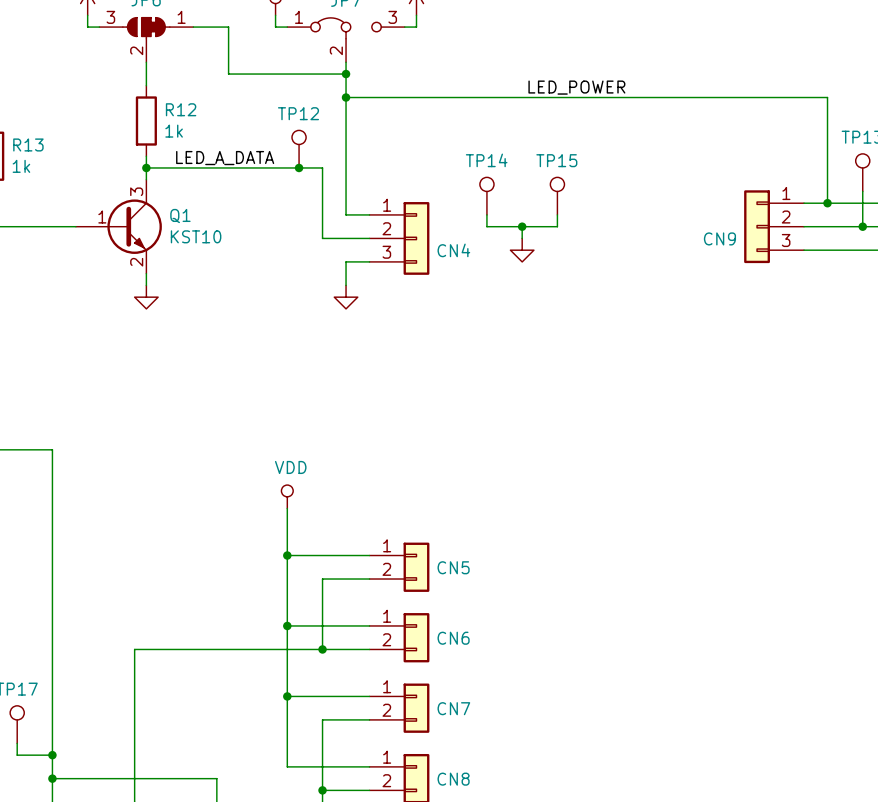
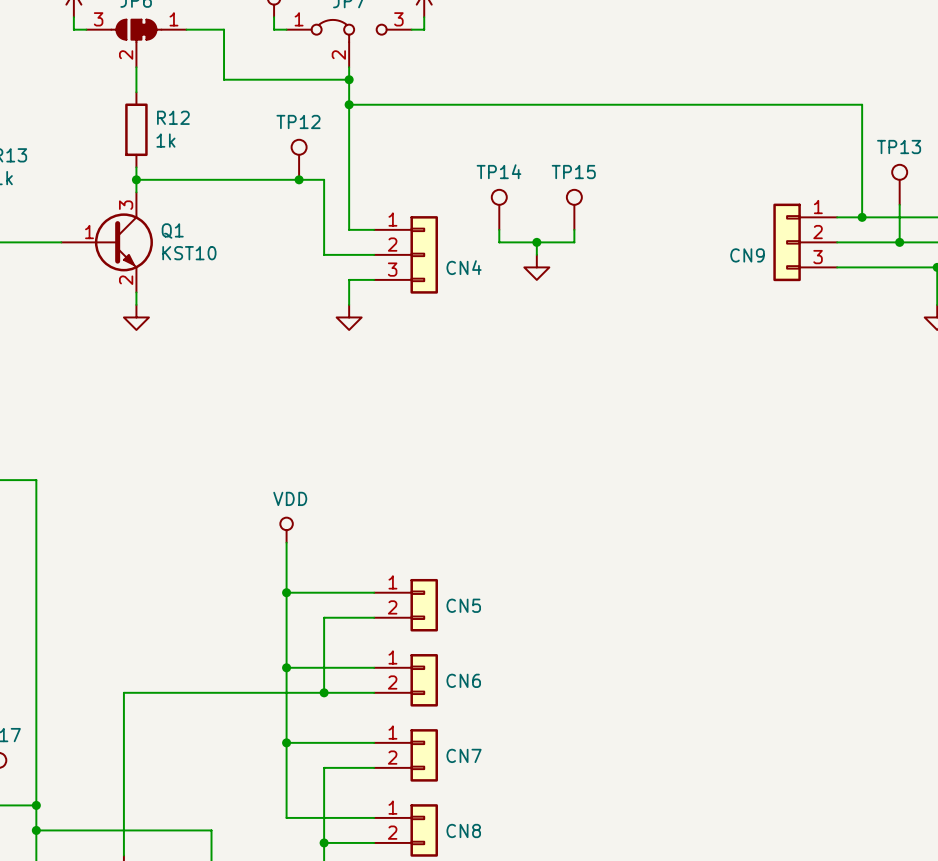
label: LED_POWER (576, 87) -> none
label: LED_A_DATA (225, 158) -> none

